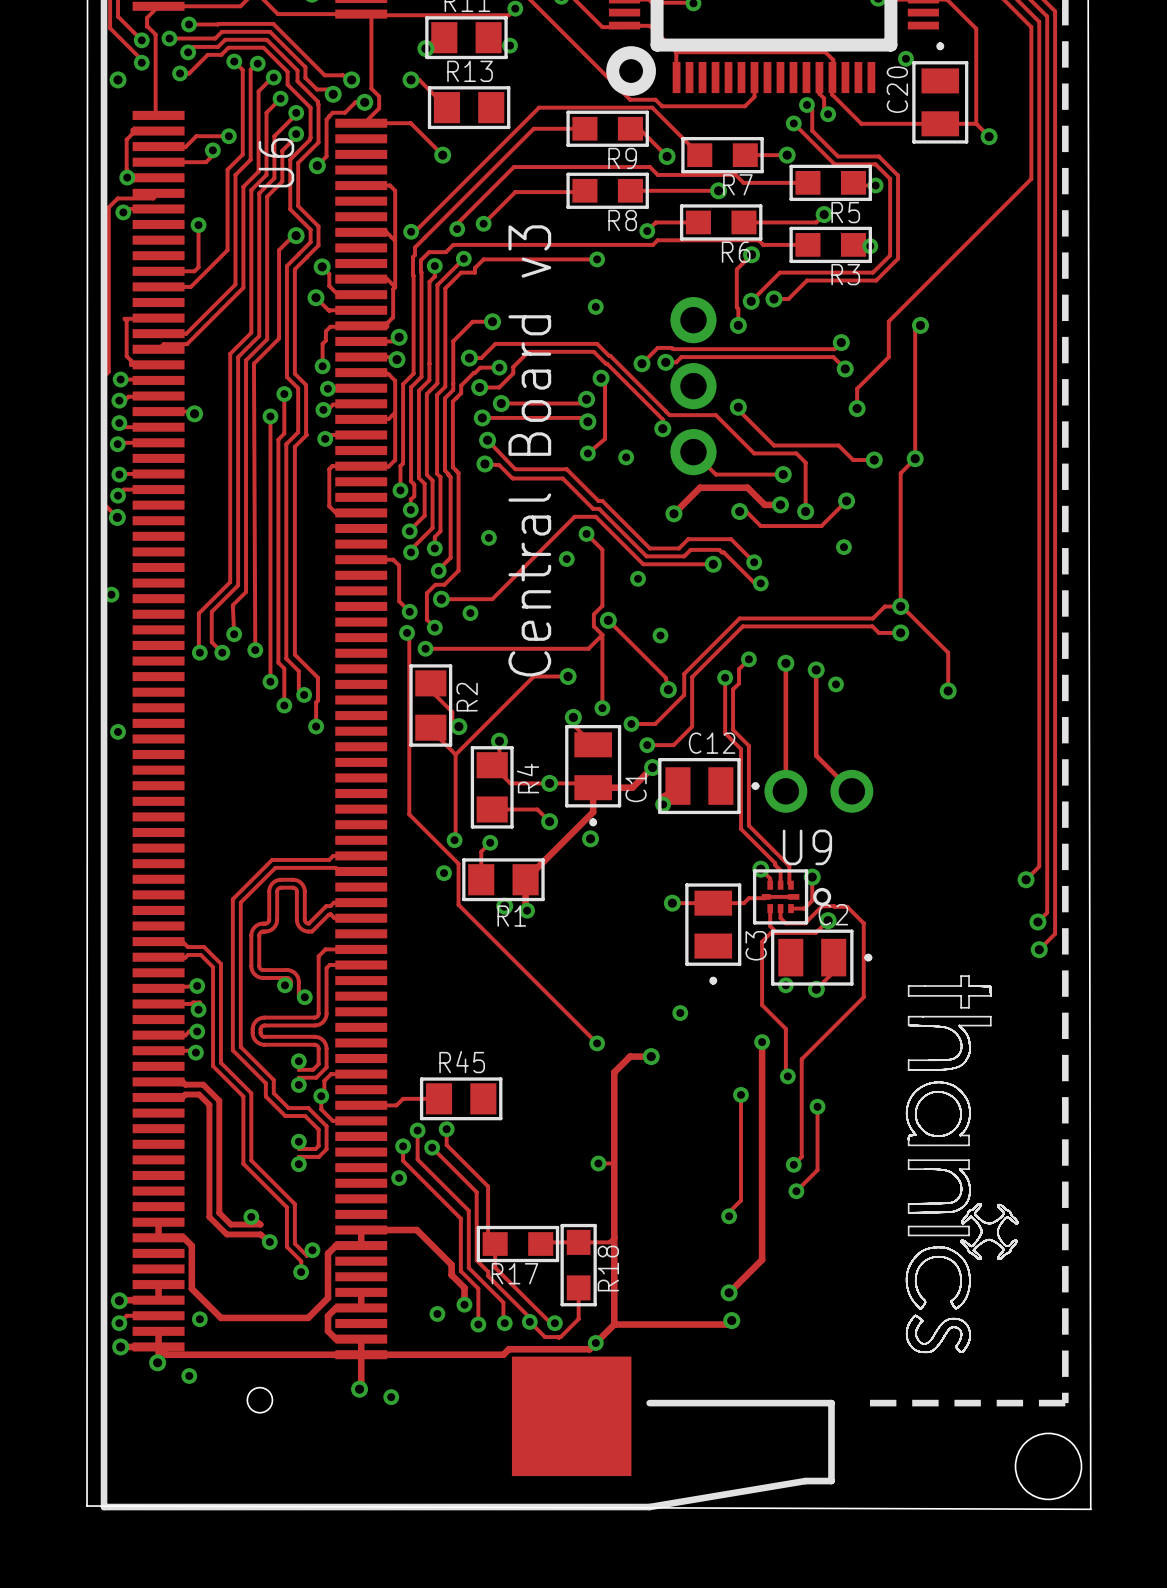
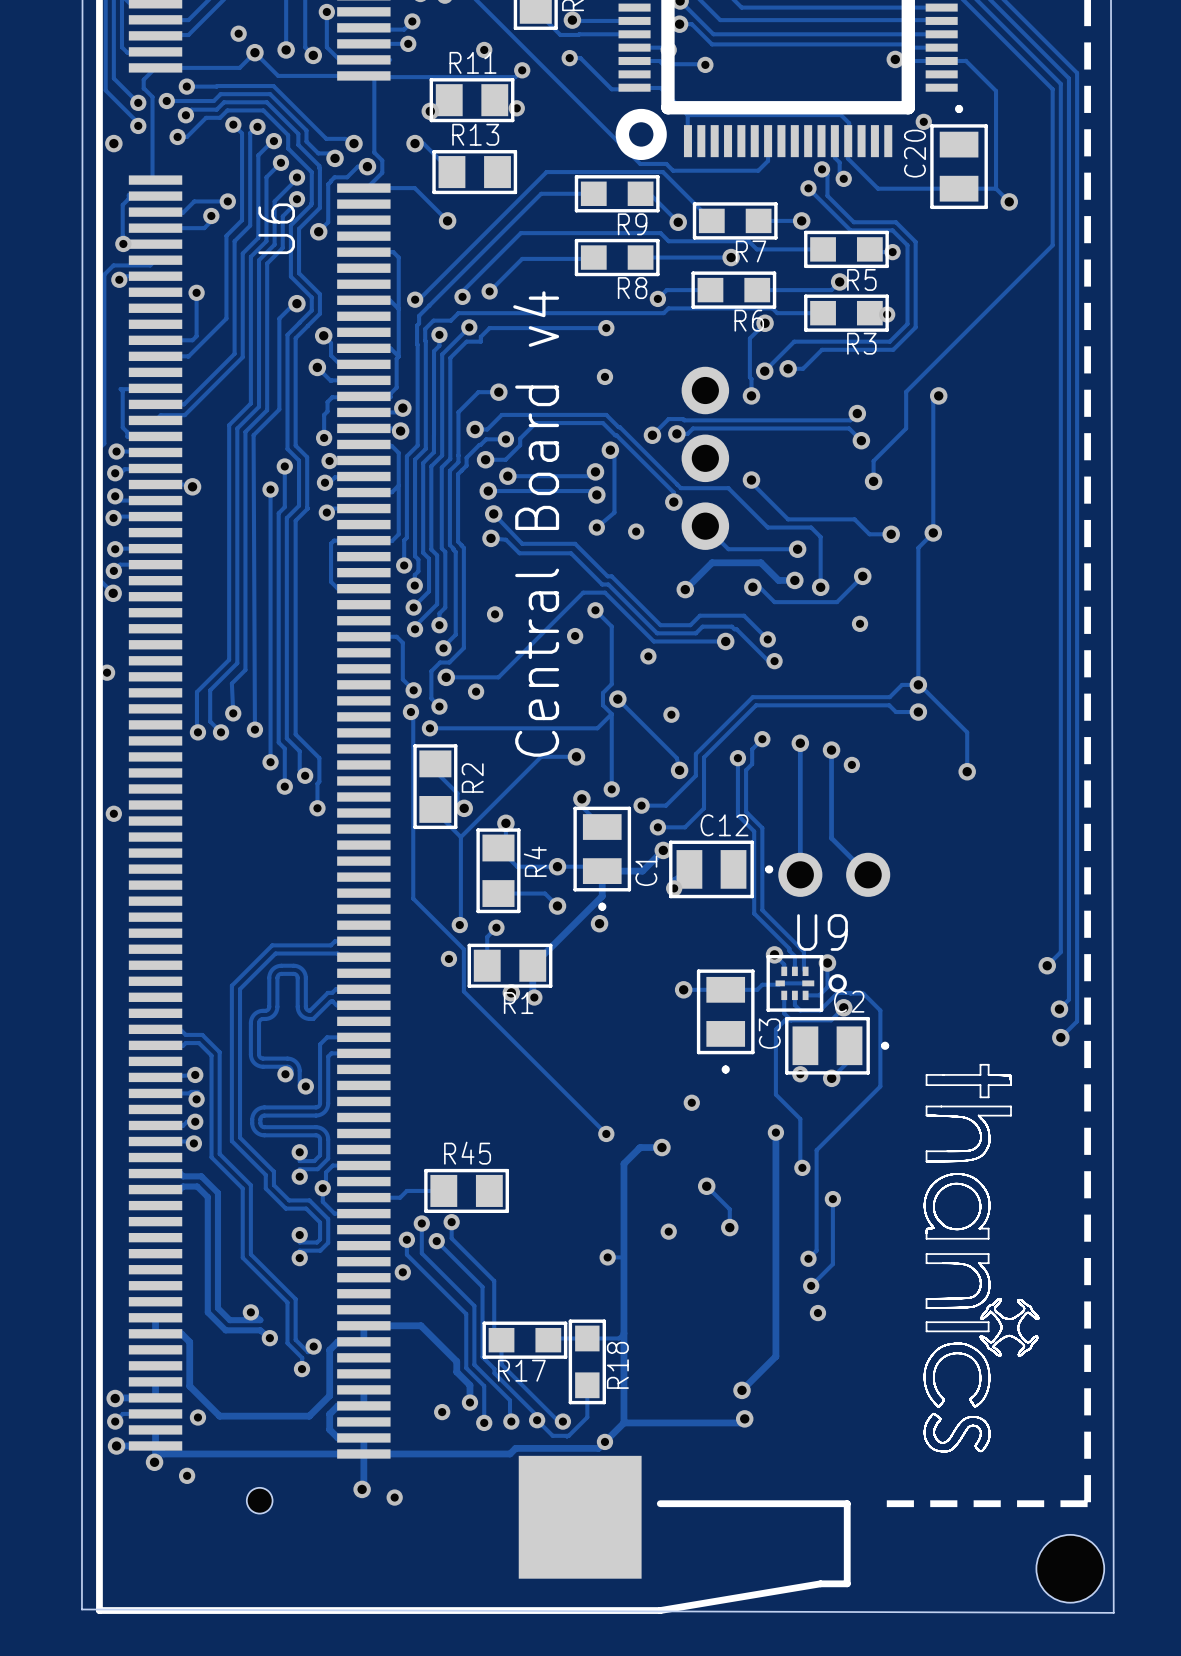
text: Central Board v3 (529, 450) -> Central Board v4 (536, 524)
track: none -> (706, 1186) (729, 1209) (729, 1227)
via: none -> (706, 1186)
track: (740, 1094) (740, 1200) (729, 1212) (729, 1216) -> none
via: (740, 1094) -> none
via: none -> (729, 1227)
via: none -> (668, 1231)
via: (729, 1216) -> none
via: none -> (817, 1313)

